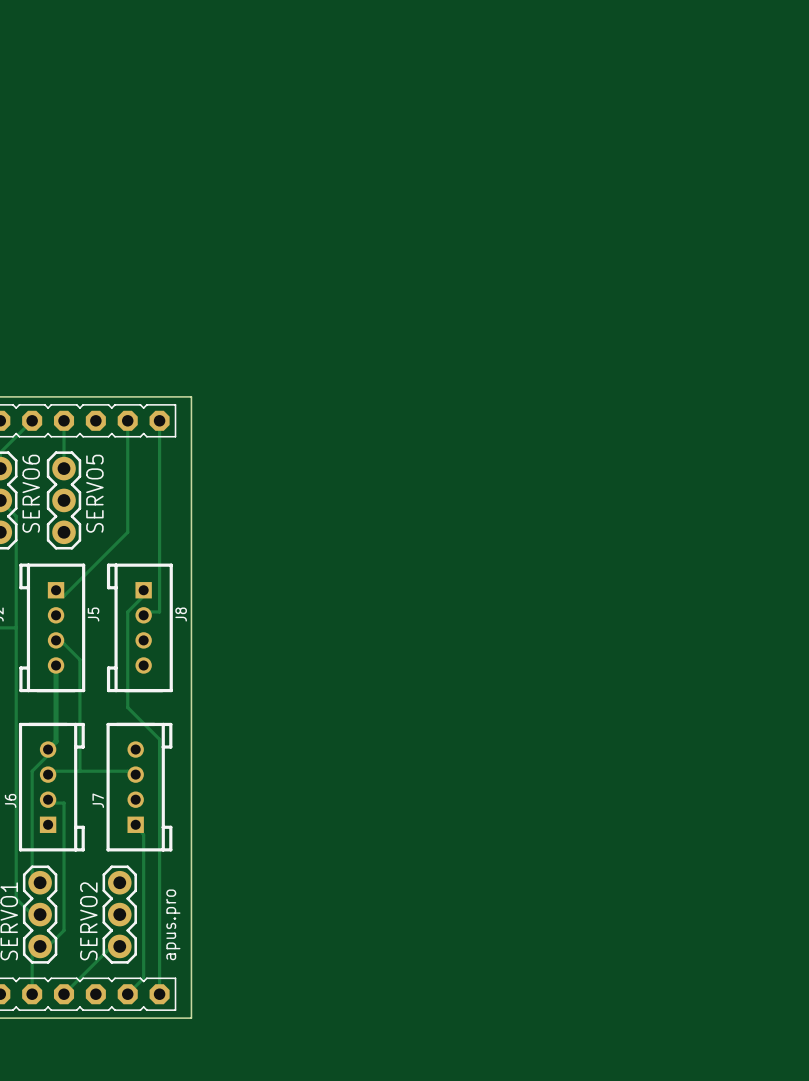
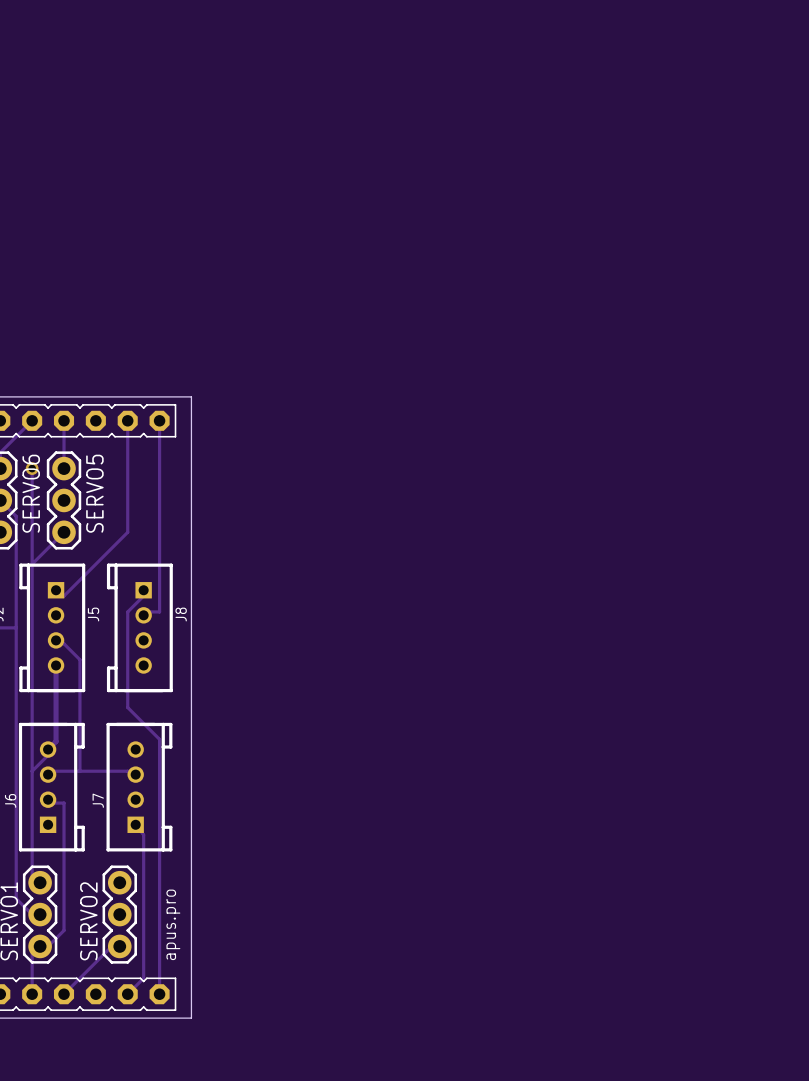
track: none -> (32, 468) (32, 771)
via: none -> (32, 468)
track: none -> (64, 532) (32, 564)

